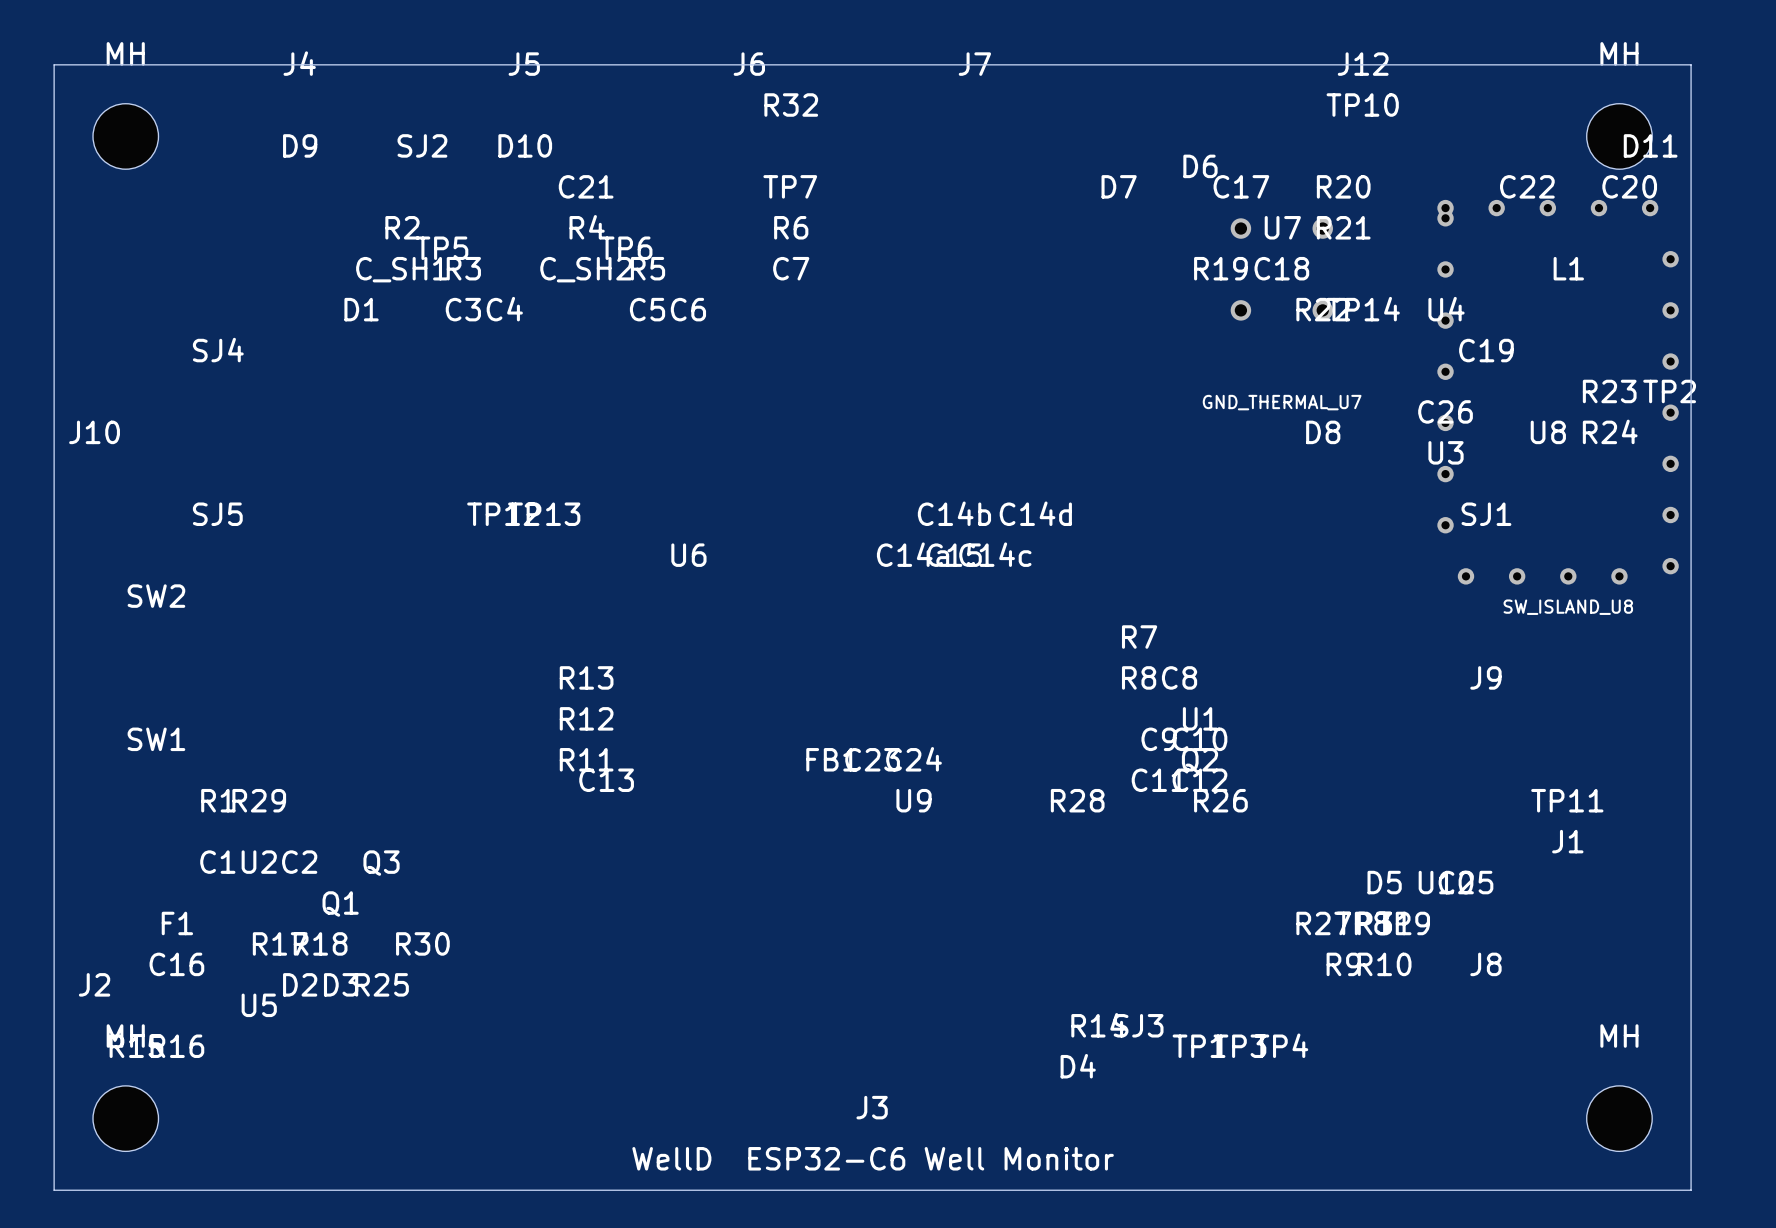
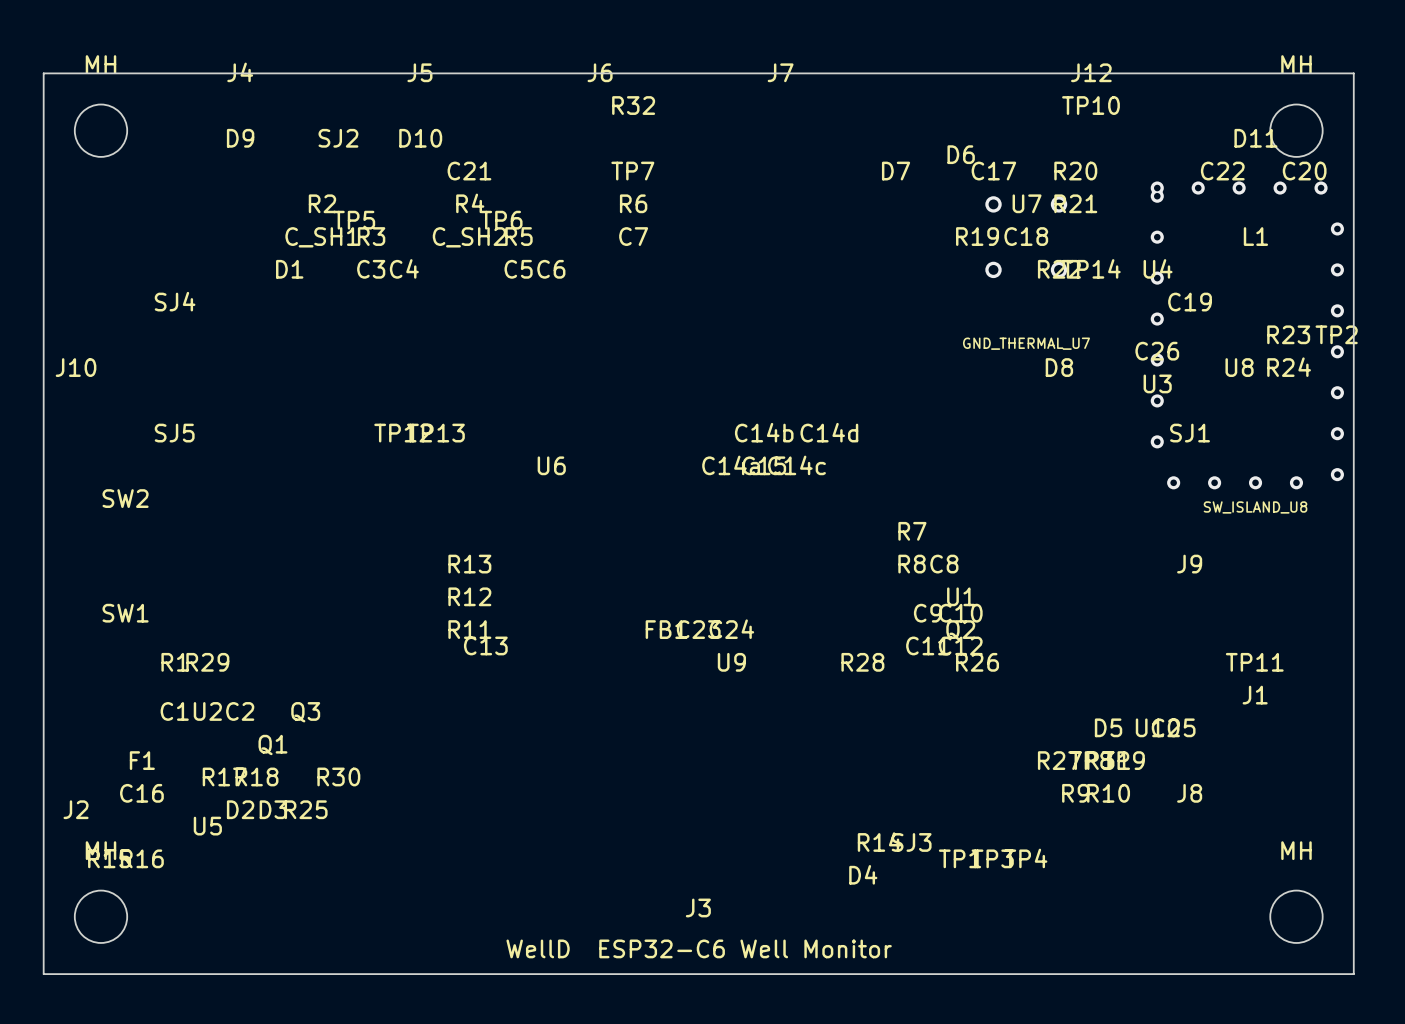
D11 position: (1650, 145) -> (1255, 138)

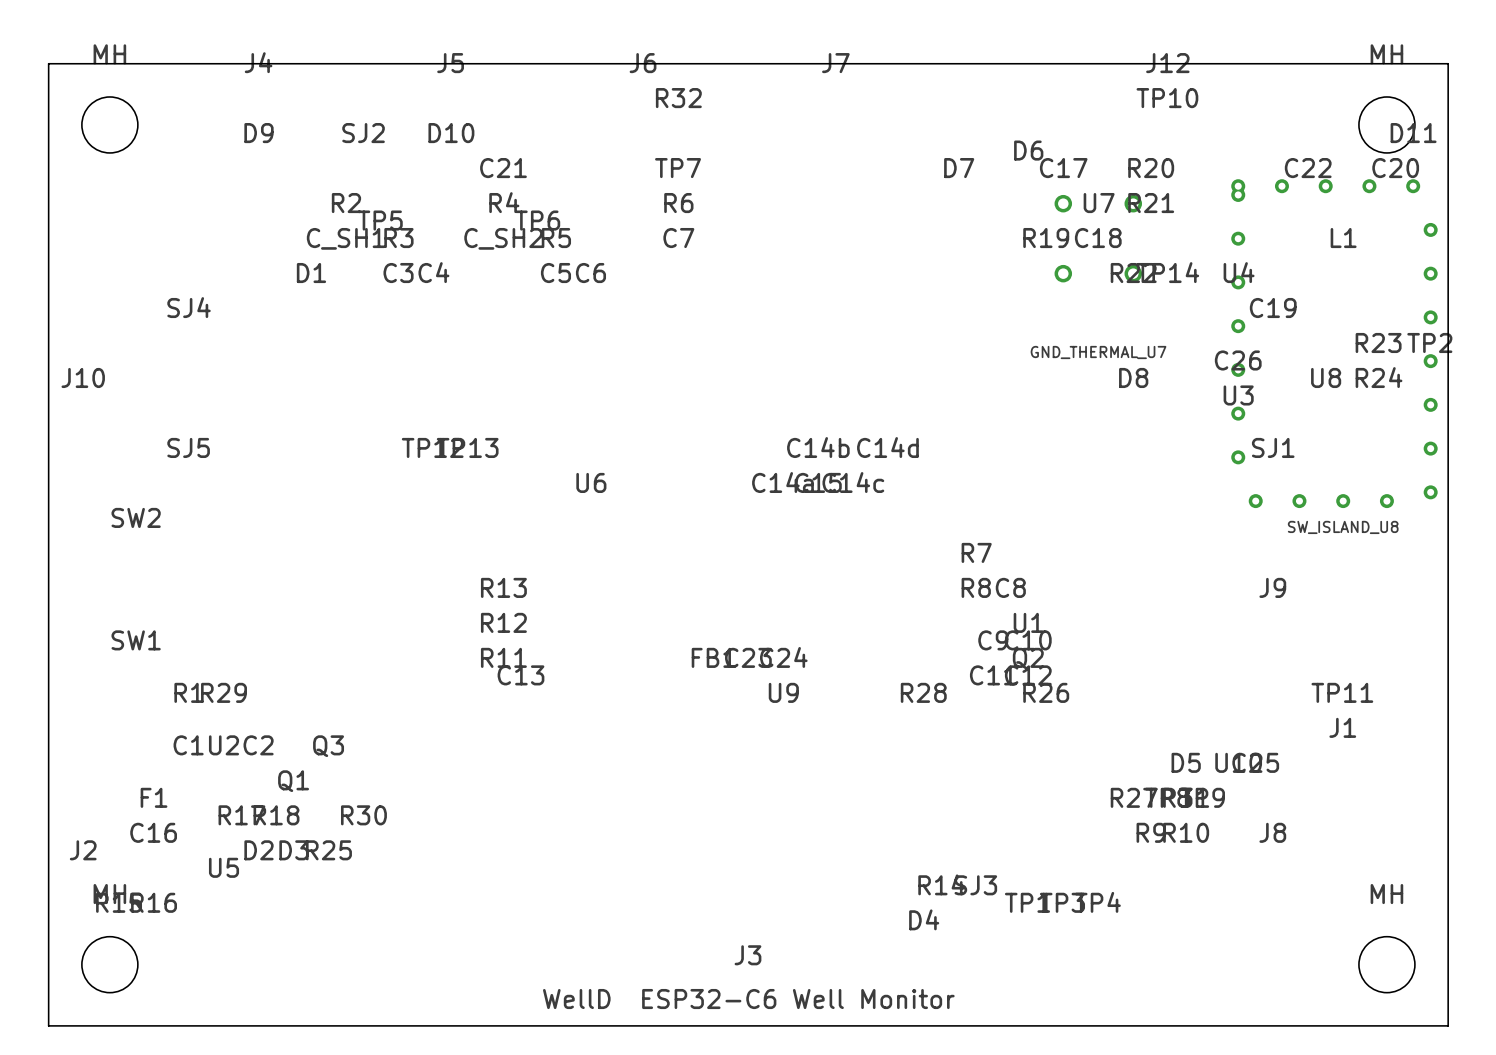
D11 position: (1255, 138) -> (1413, 133)

